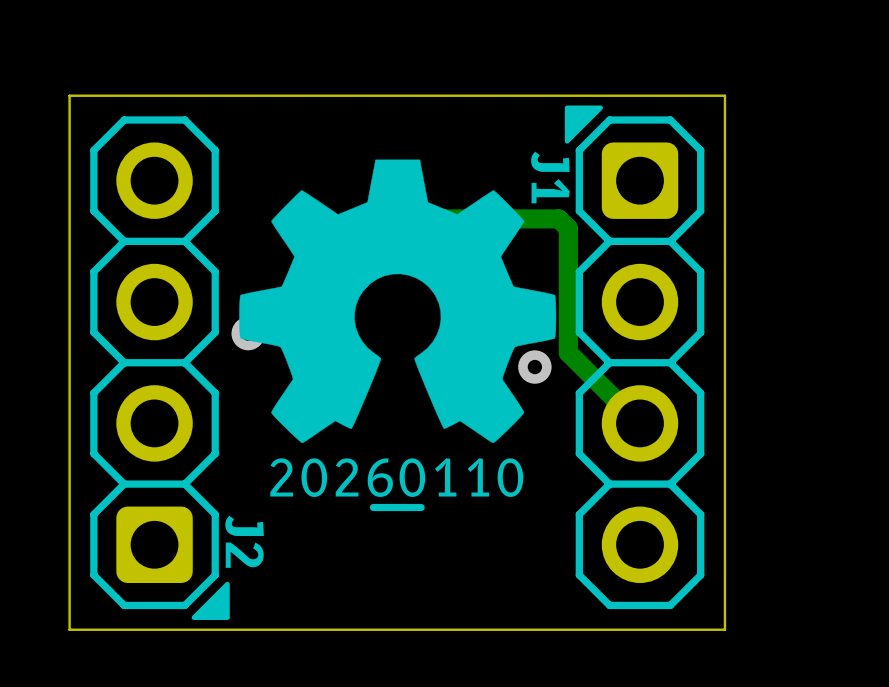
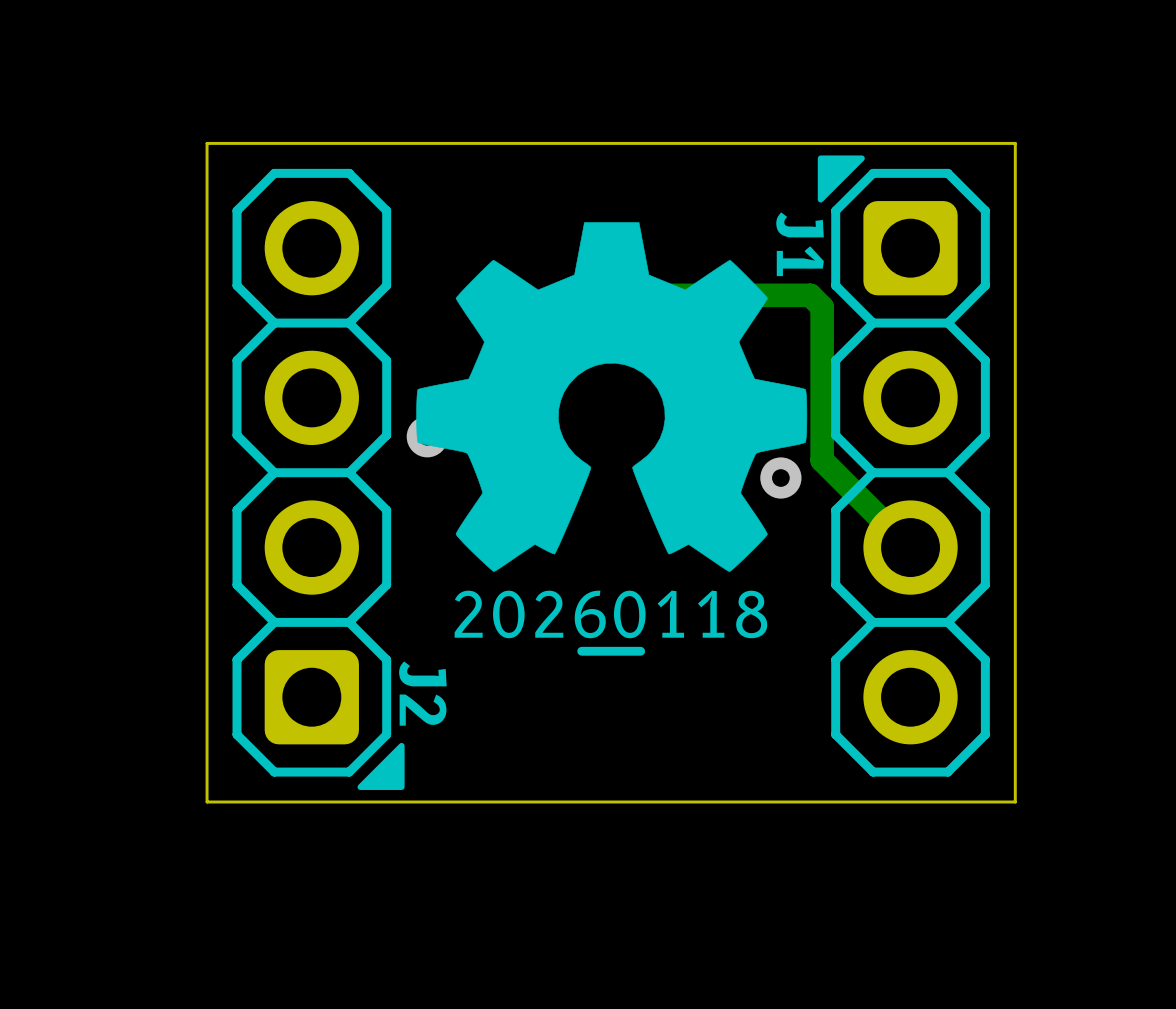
drawing shape: [270, 458, 524, 512] -> [454, 590, 768, 656]

